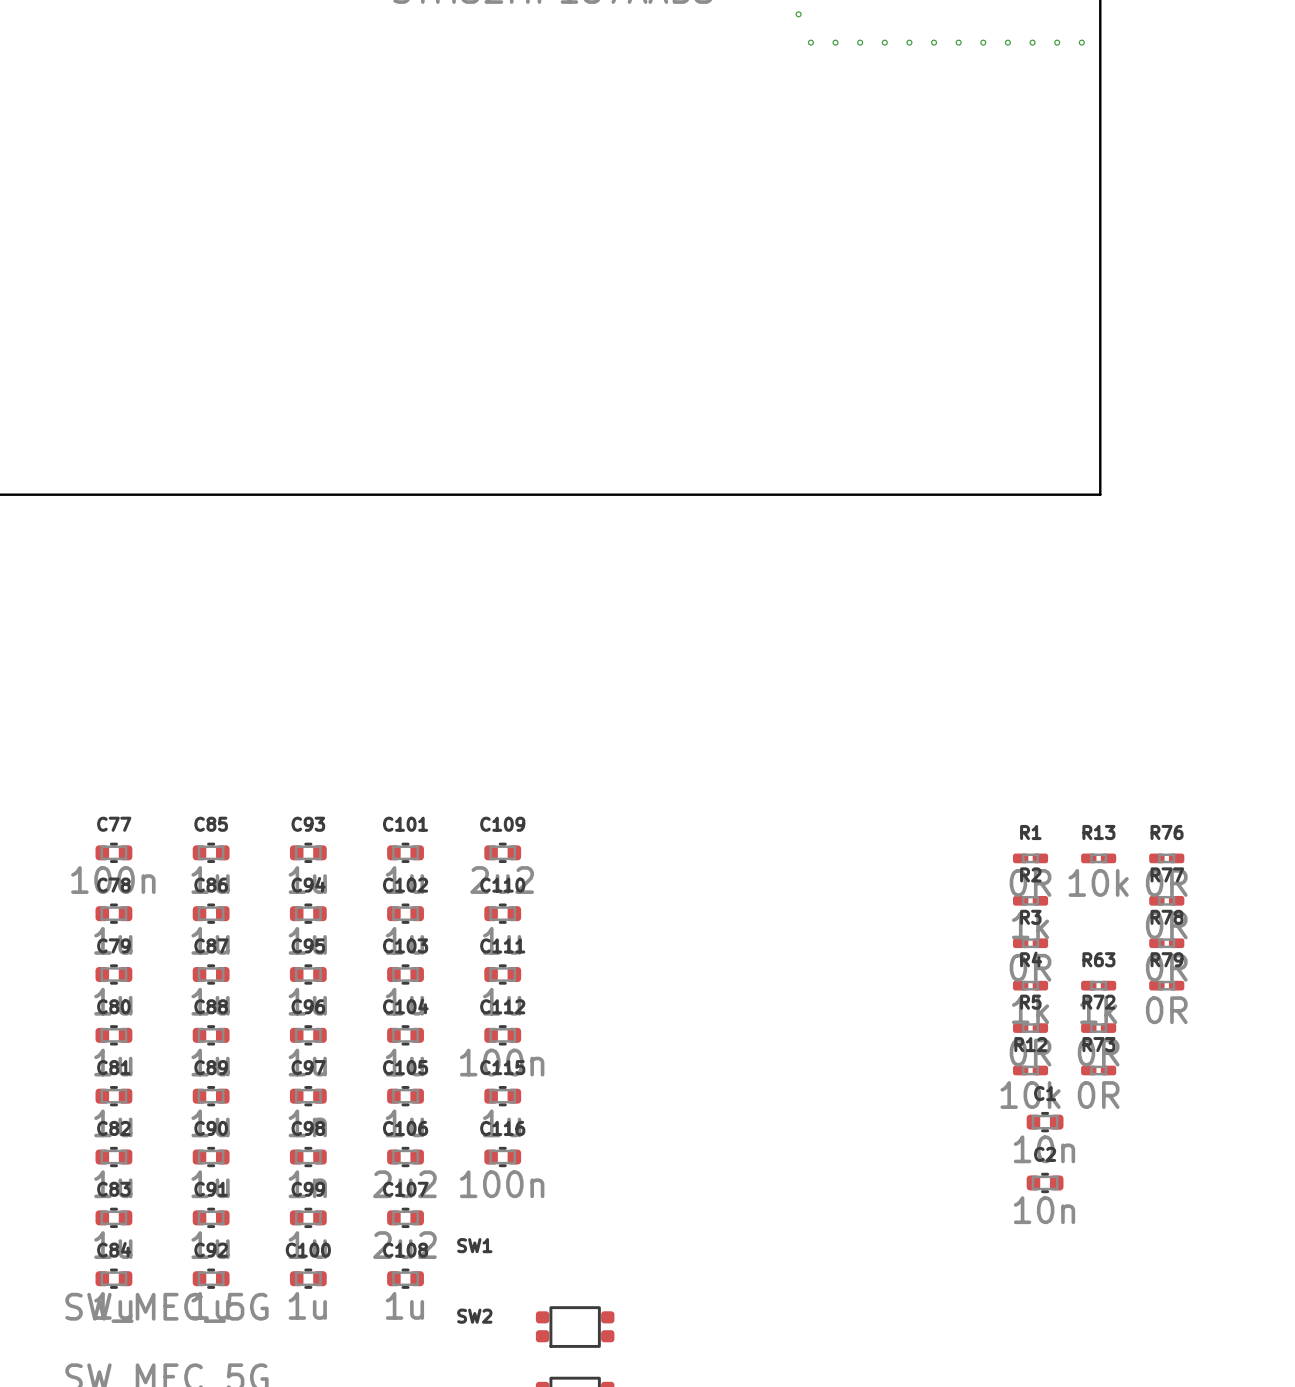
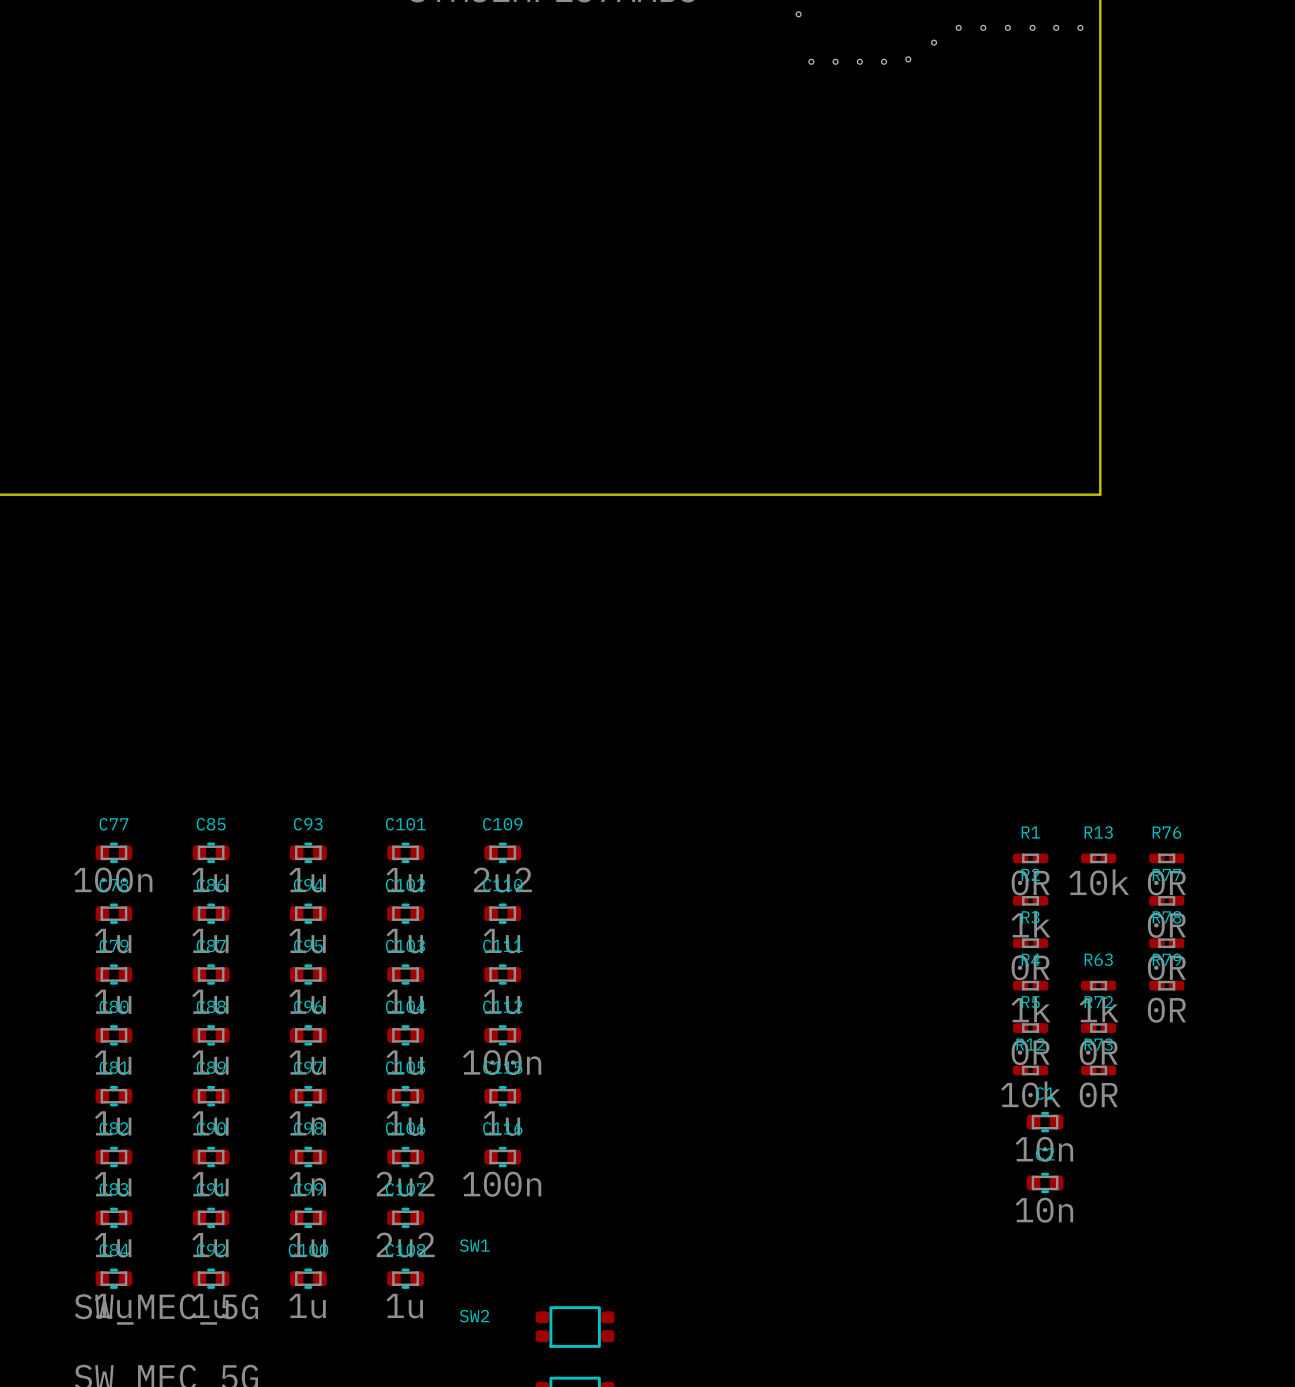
via: none -> (958, 27)
via: none -> (983, 27)
via: none -> (1007, 27)
via: none -> (1032, 27)
via: none -> (1056, 27)
via: none -> (1080, 27)
via: (810, 42) -> none
via: (835, 42) -> none
via: (860, 42) -> none
via: (884, 42) -> none
via: (909, 42) -> none
via: (958, 42) -> none
via: (983, 42) -> none
via: (1007, 42) -> none
via: (1032, 42) -> none
via: (1057, 42) -> none
via: (1081, 42) -> none
via: none -> (908, 59)
via: none -> (811, 61)
via: none -> (835, 61)
via: none -> (859, 61)
via: none -> (884, 61)

